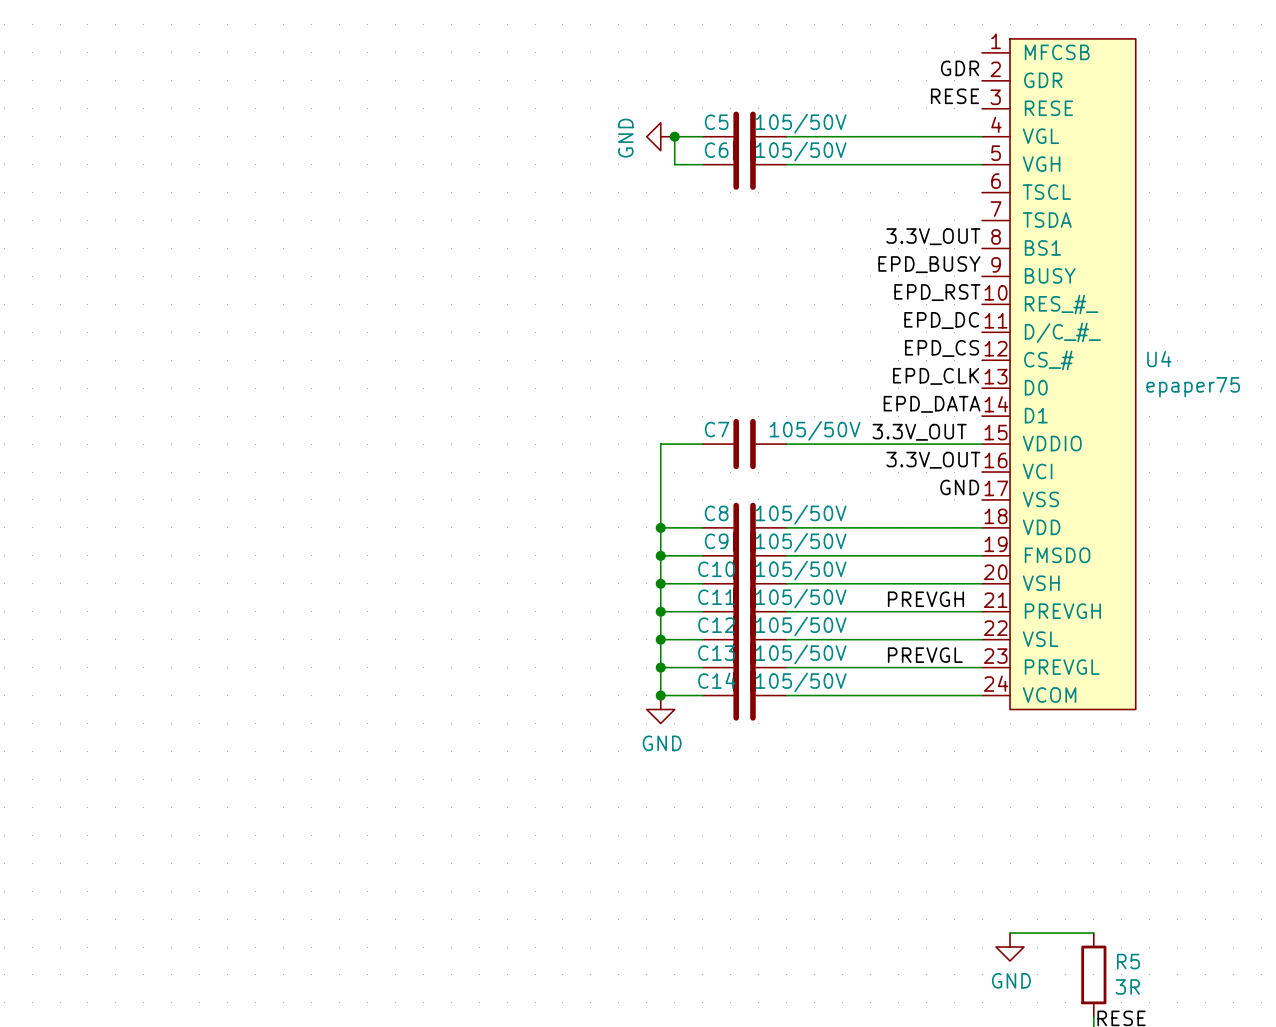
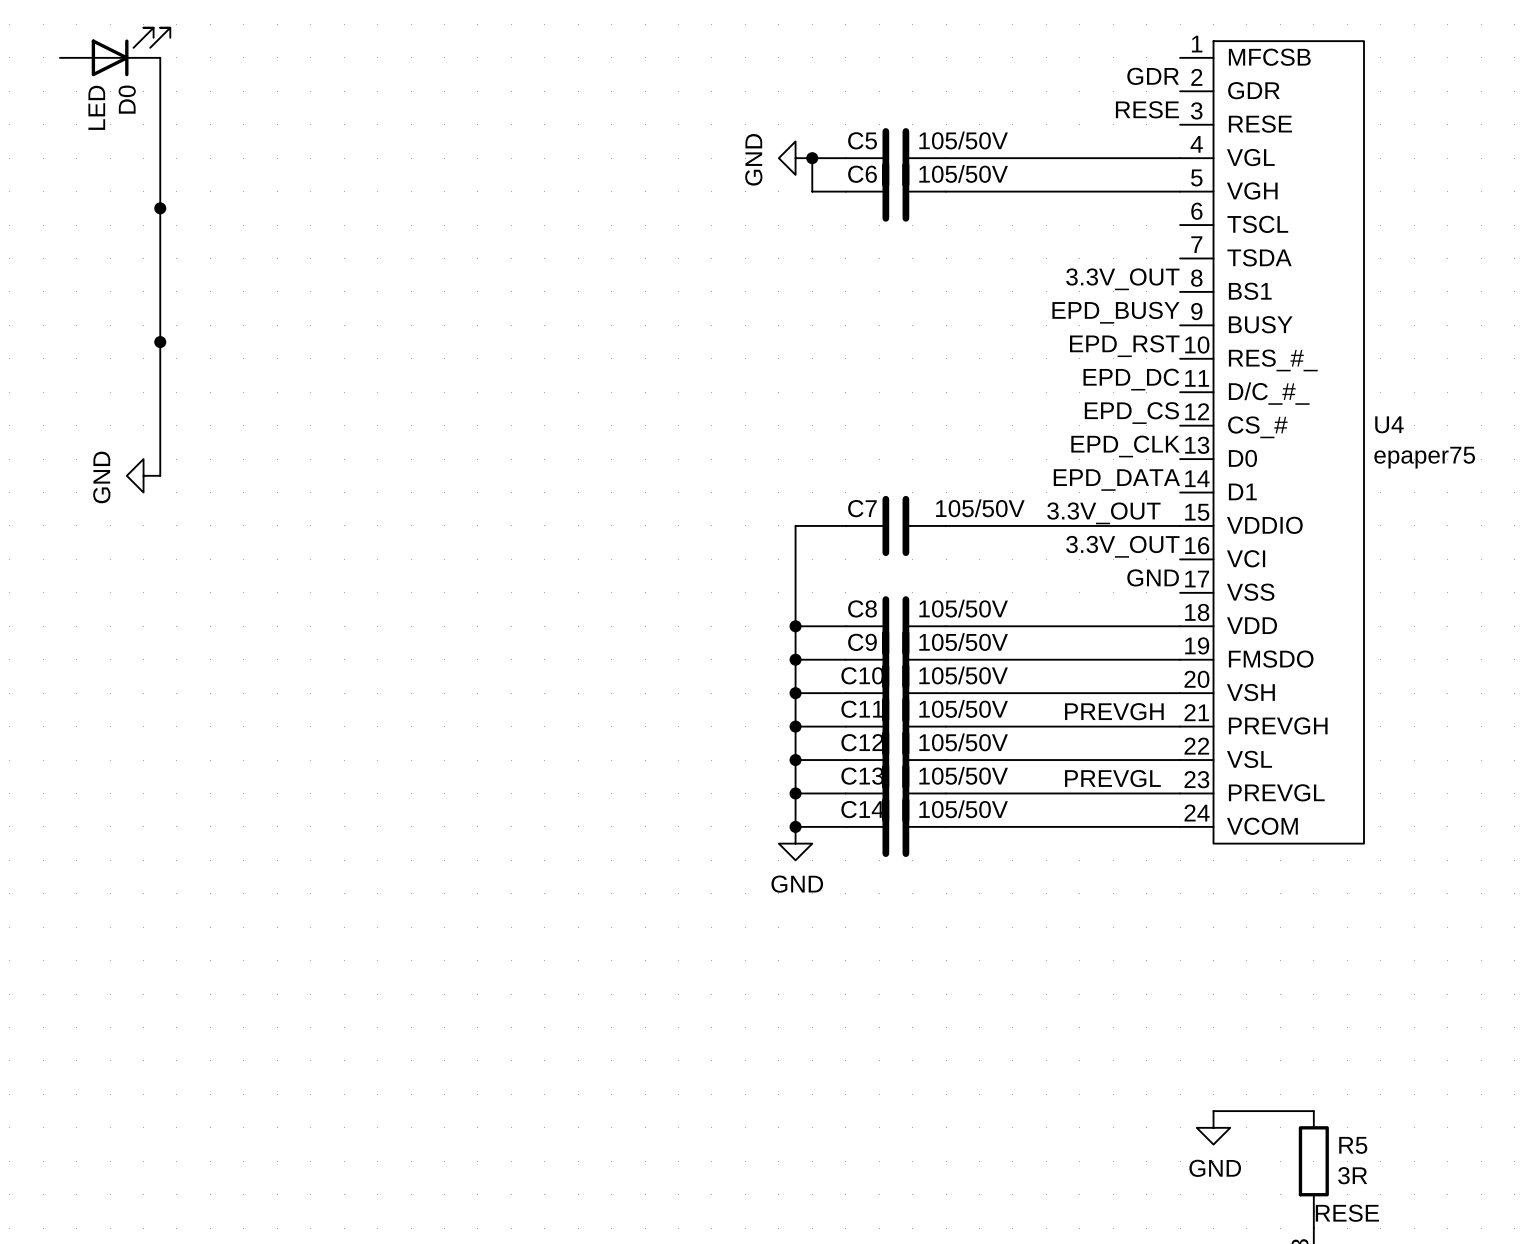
D0: none -> LED (115, 52)
wire: none -> (160, 57) (160, 475)
junction: none -> (160, 208)
junction: none -> (160, 342)
power symbol: none -> GND (143, 475)

